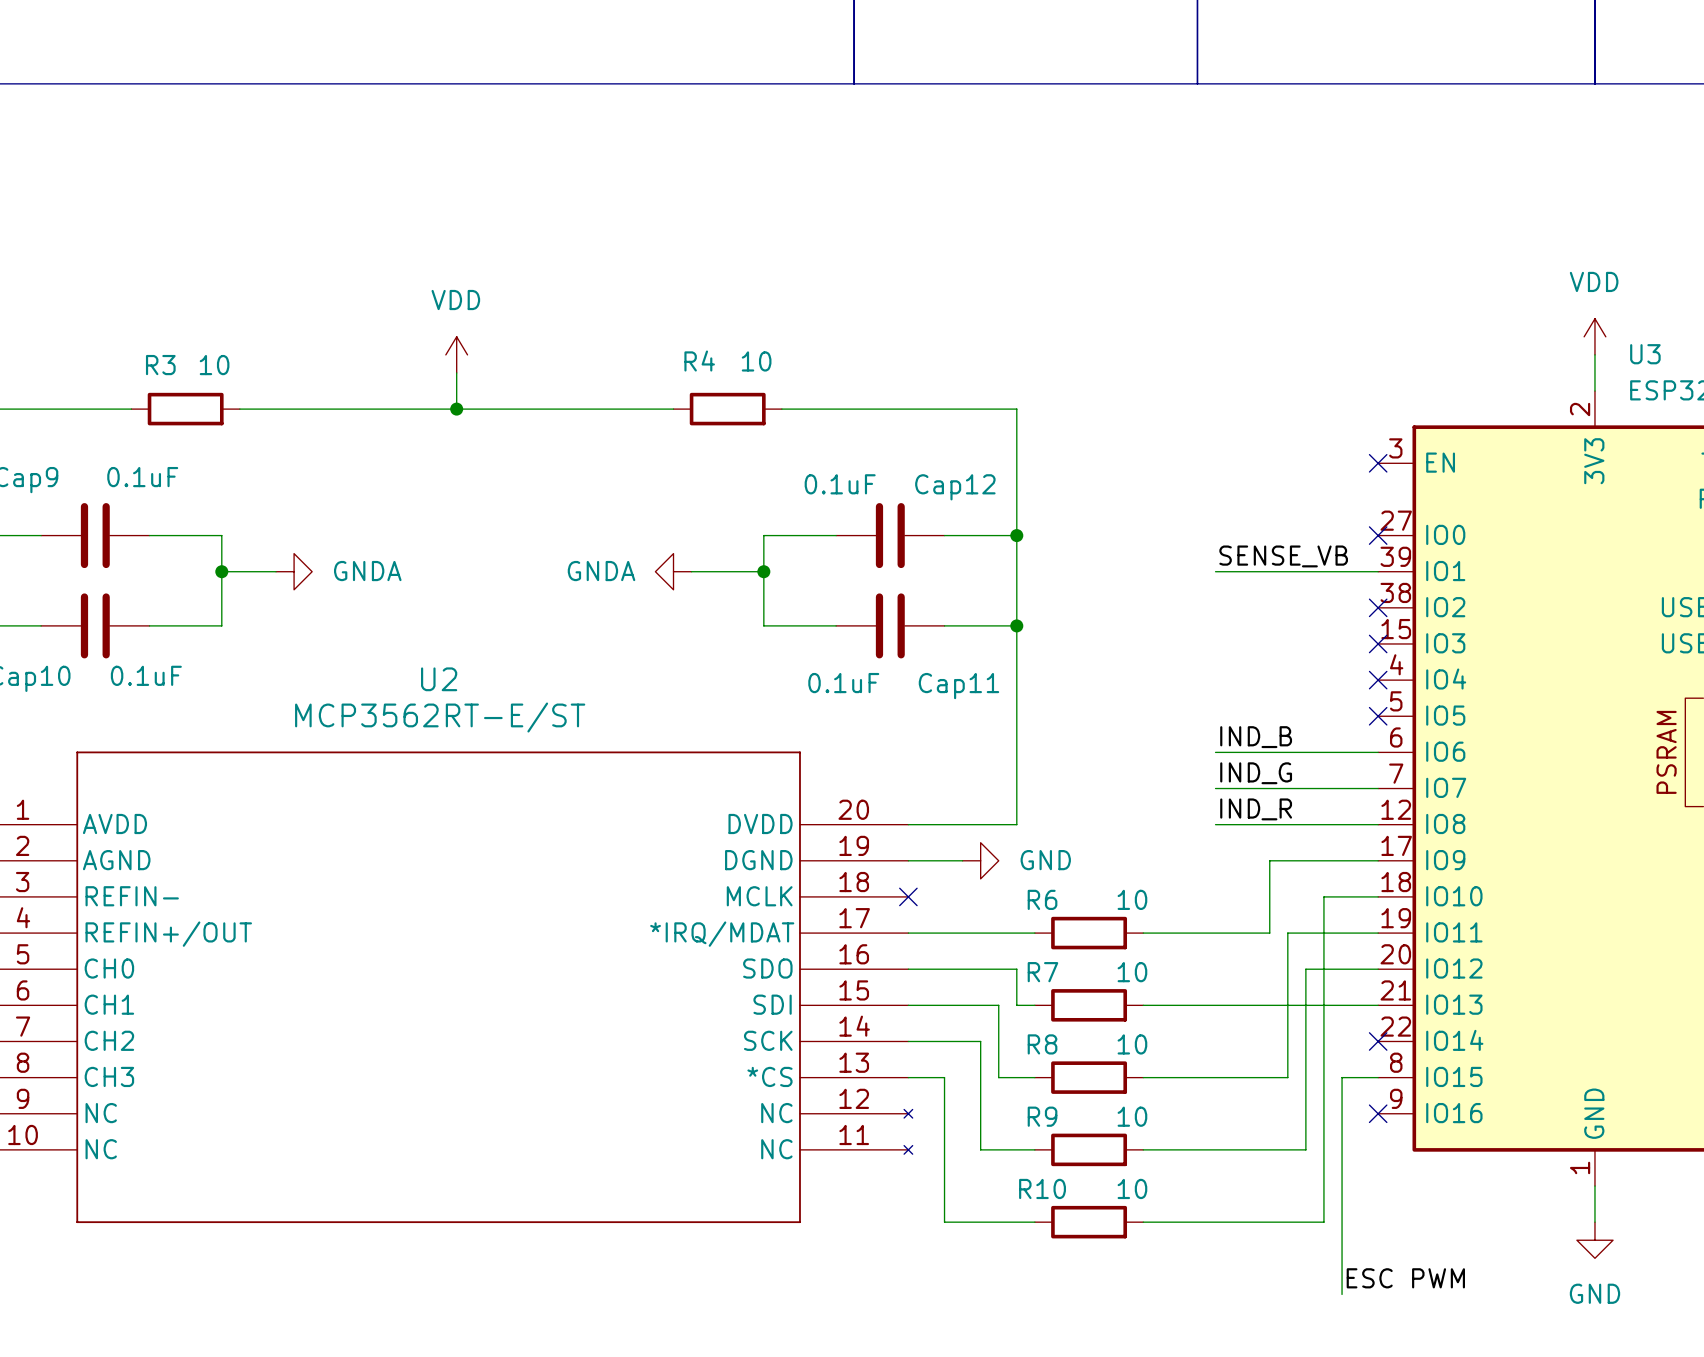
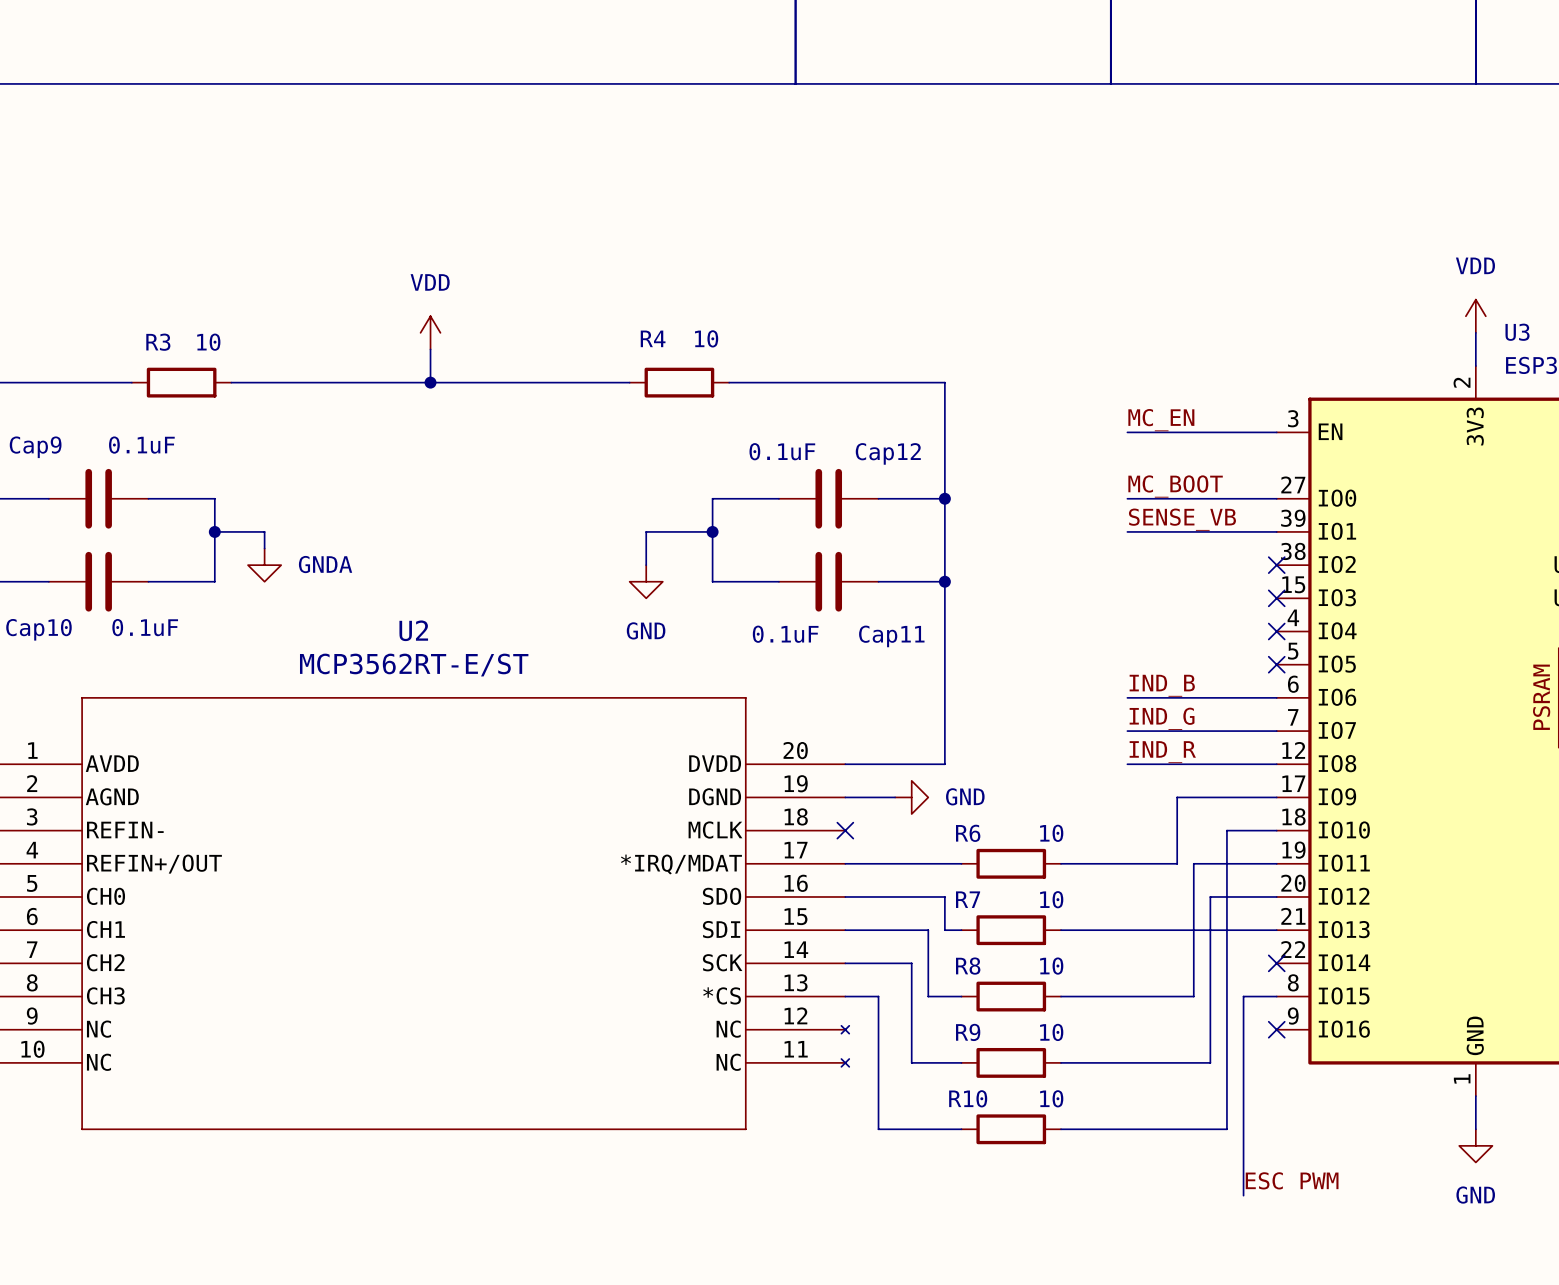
label: none -> MC_EN (1161, 420)
wire: none -> (1127, 432) (1276, 432)
no-connect mark: (1378, 463) -> none
label: none -> MC_BOOT (1175, 486)
wire: none -> (1127, 498) (1276, 498)
no-connect mark: (1378, 535) -> none
wire: none -> (264, 531) (264, 548)
power symbol rotation: 0° (294, 571) -> 90° clockwise (264, 565)
power symbol position: GNDA (294, 571) -> GNDA (264, 565)
power symbol: GNDA (673, 571) -> none
wire: none -> (646, 531) (646, 565)
power symbol: none -> GND (646, 581)

